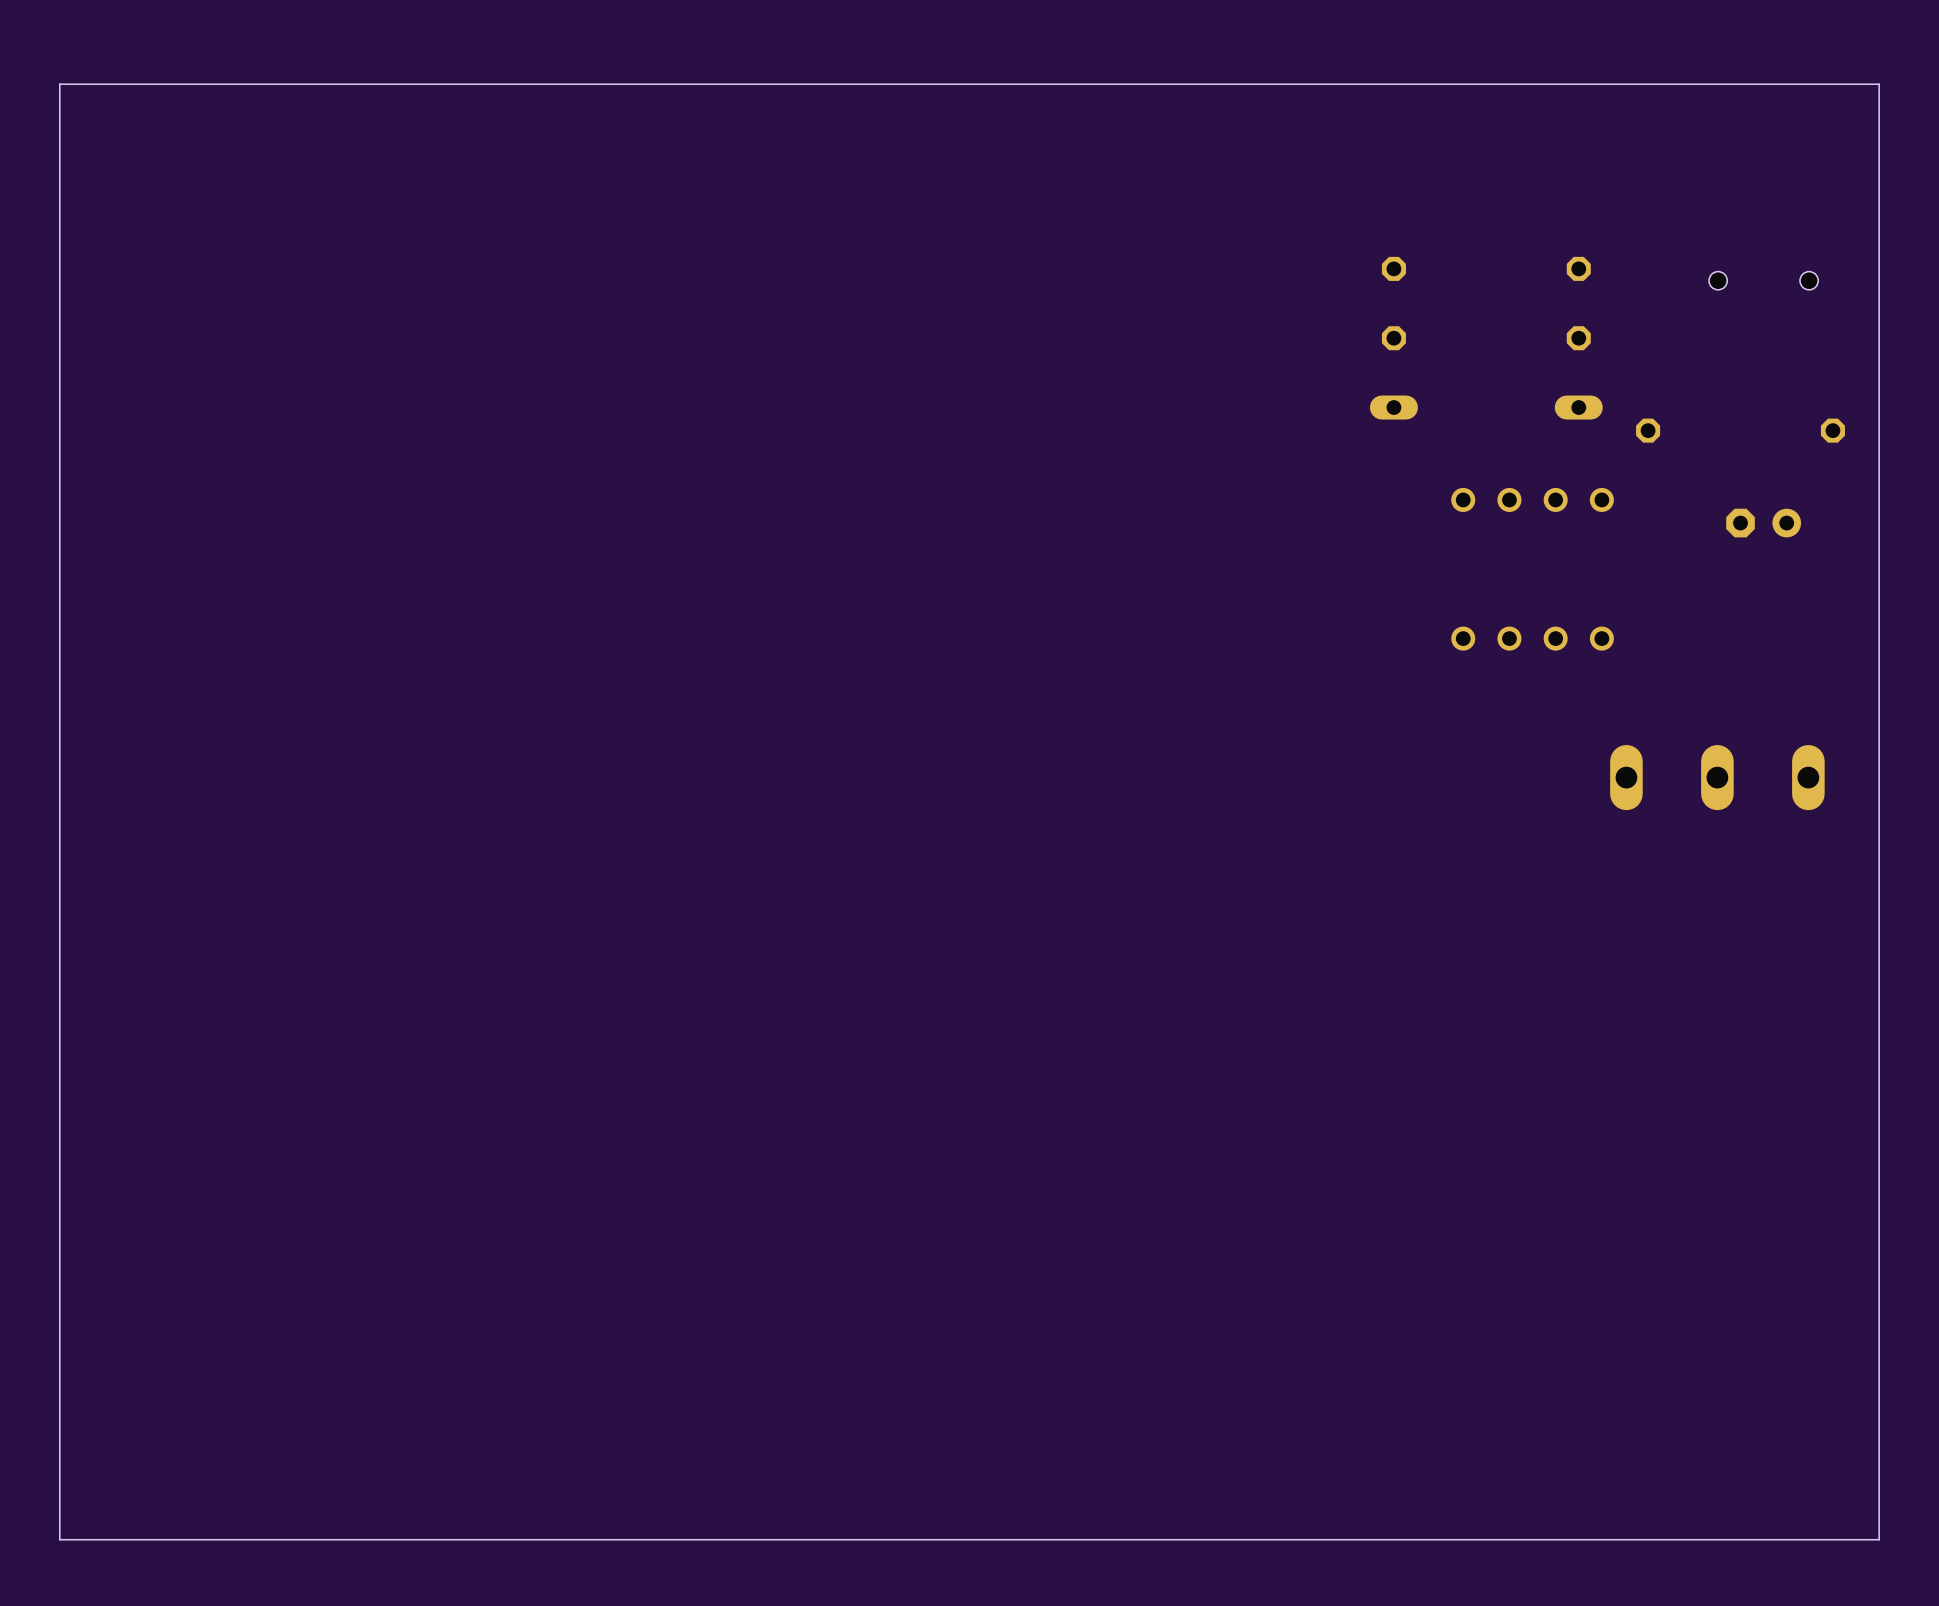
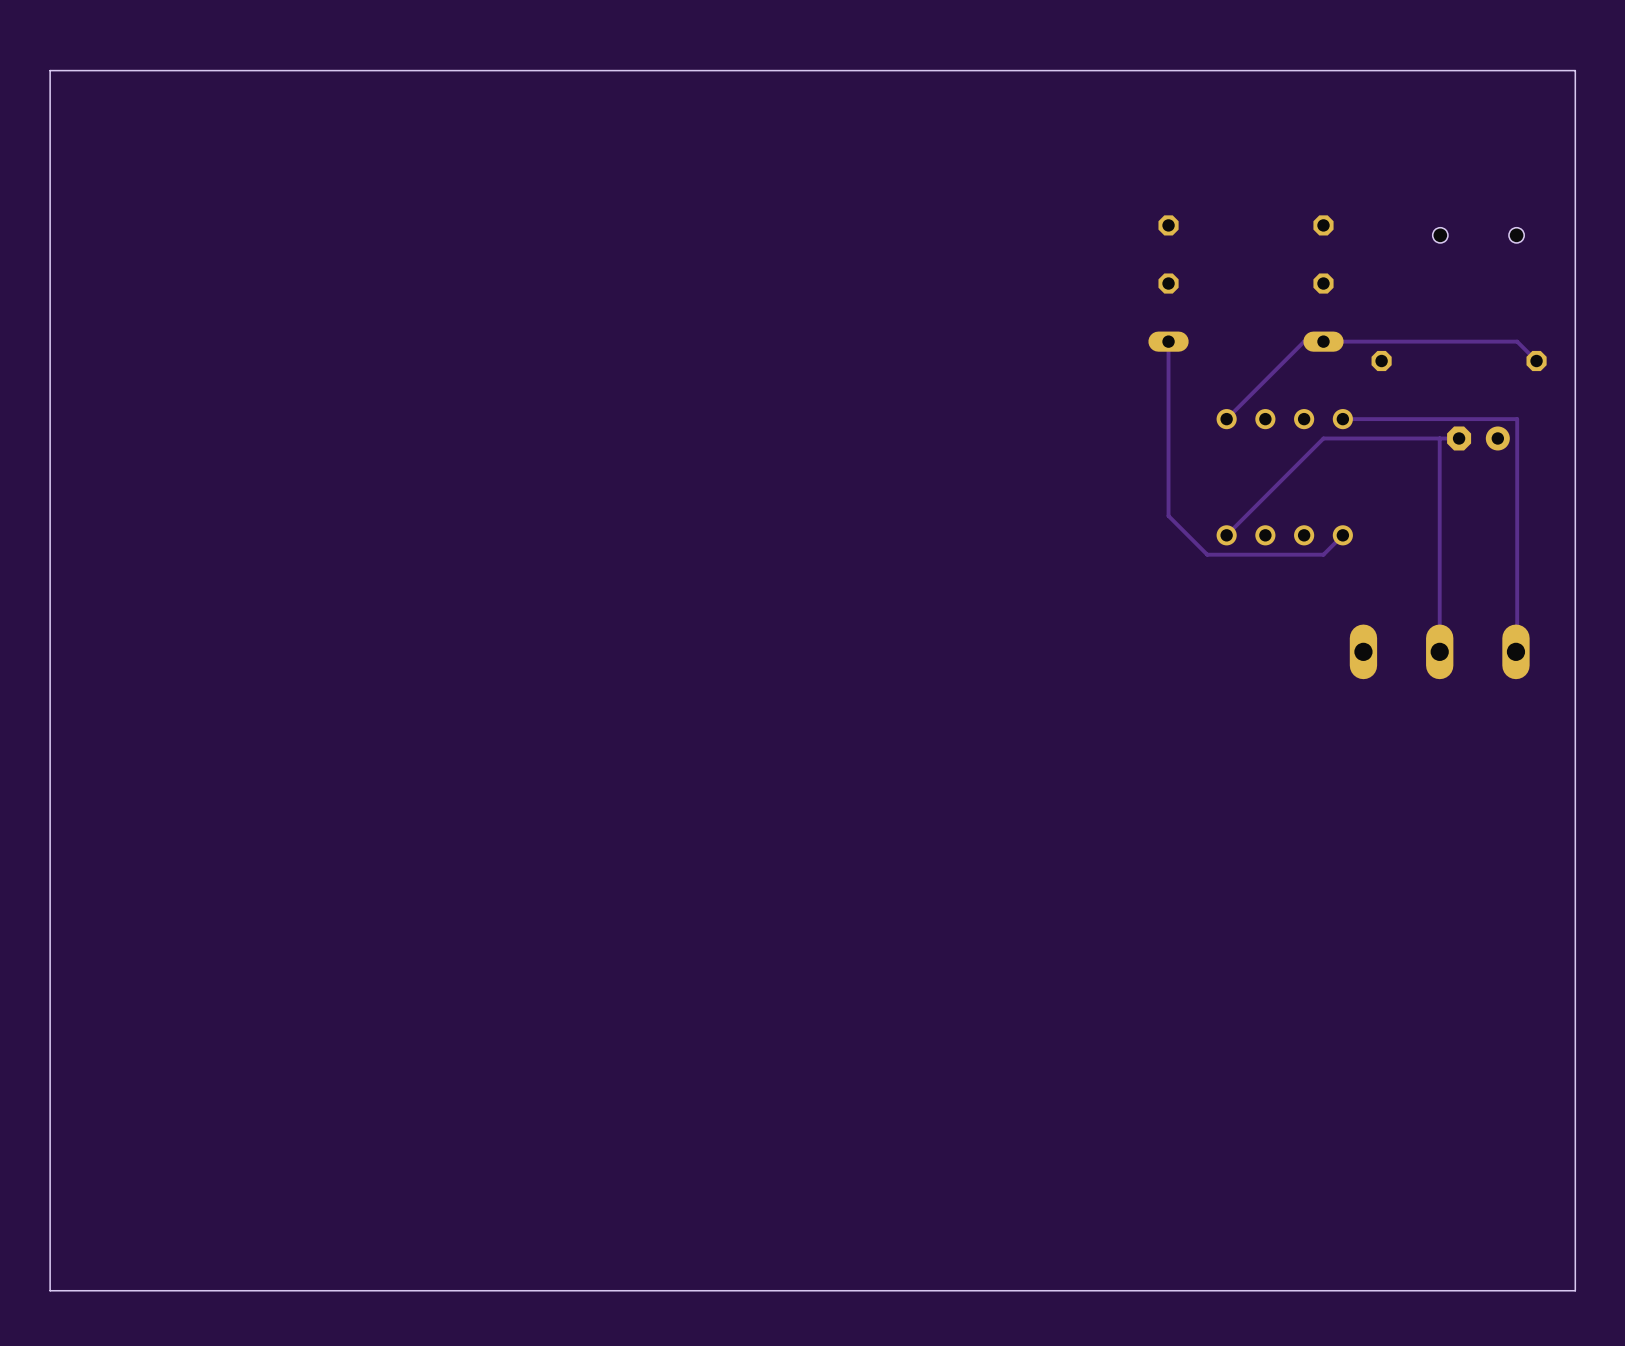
track: none -> (1168, 341) (1168, 515) (1207, 554) (1323, 554) (1342, 535)
track: none -> (1536, 361) (1517, 341) (1304, 341) (1226, 419)
track: none -> (1342, 419) (1517, 419) (1515, 651)
track: none -> (1439, 438) (1439, 651)
track: none -> (1459, 438) (1323, 438) (1226, 535)

